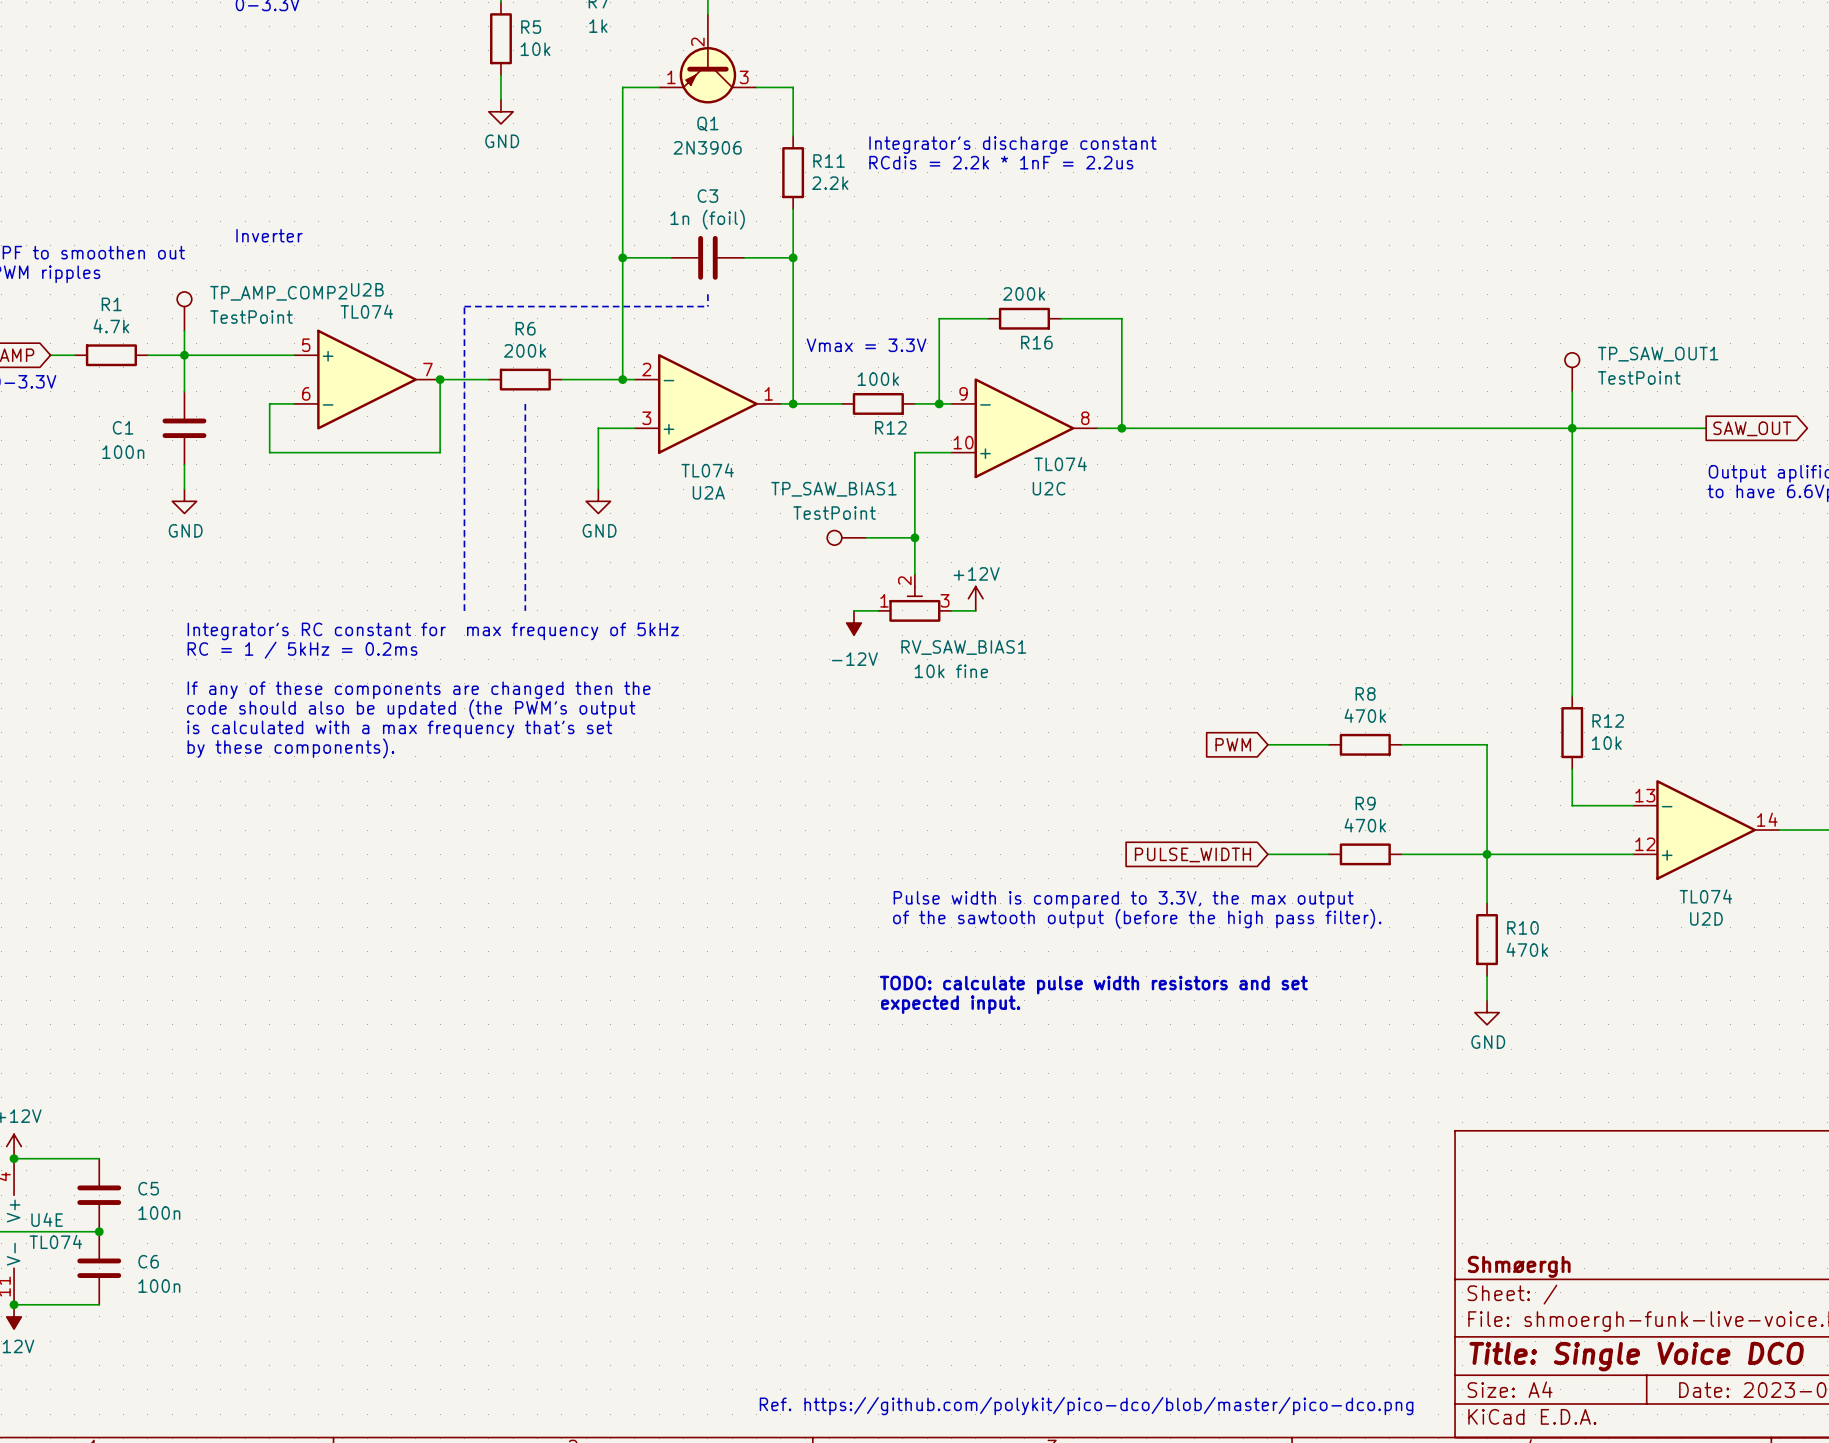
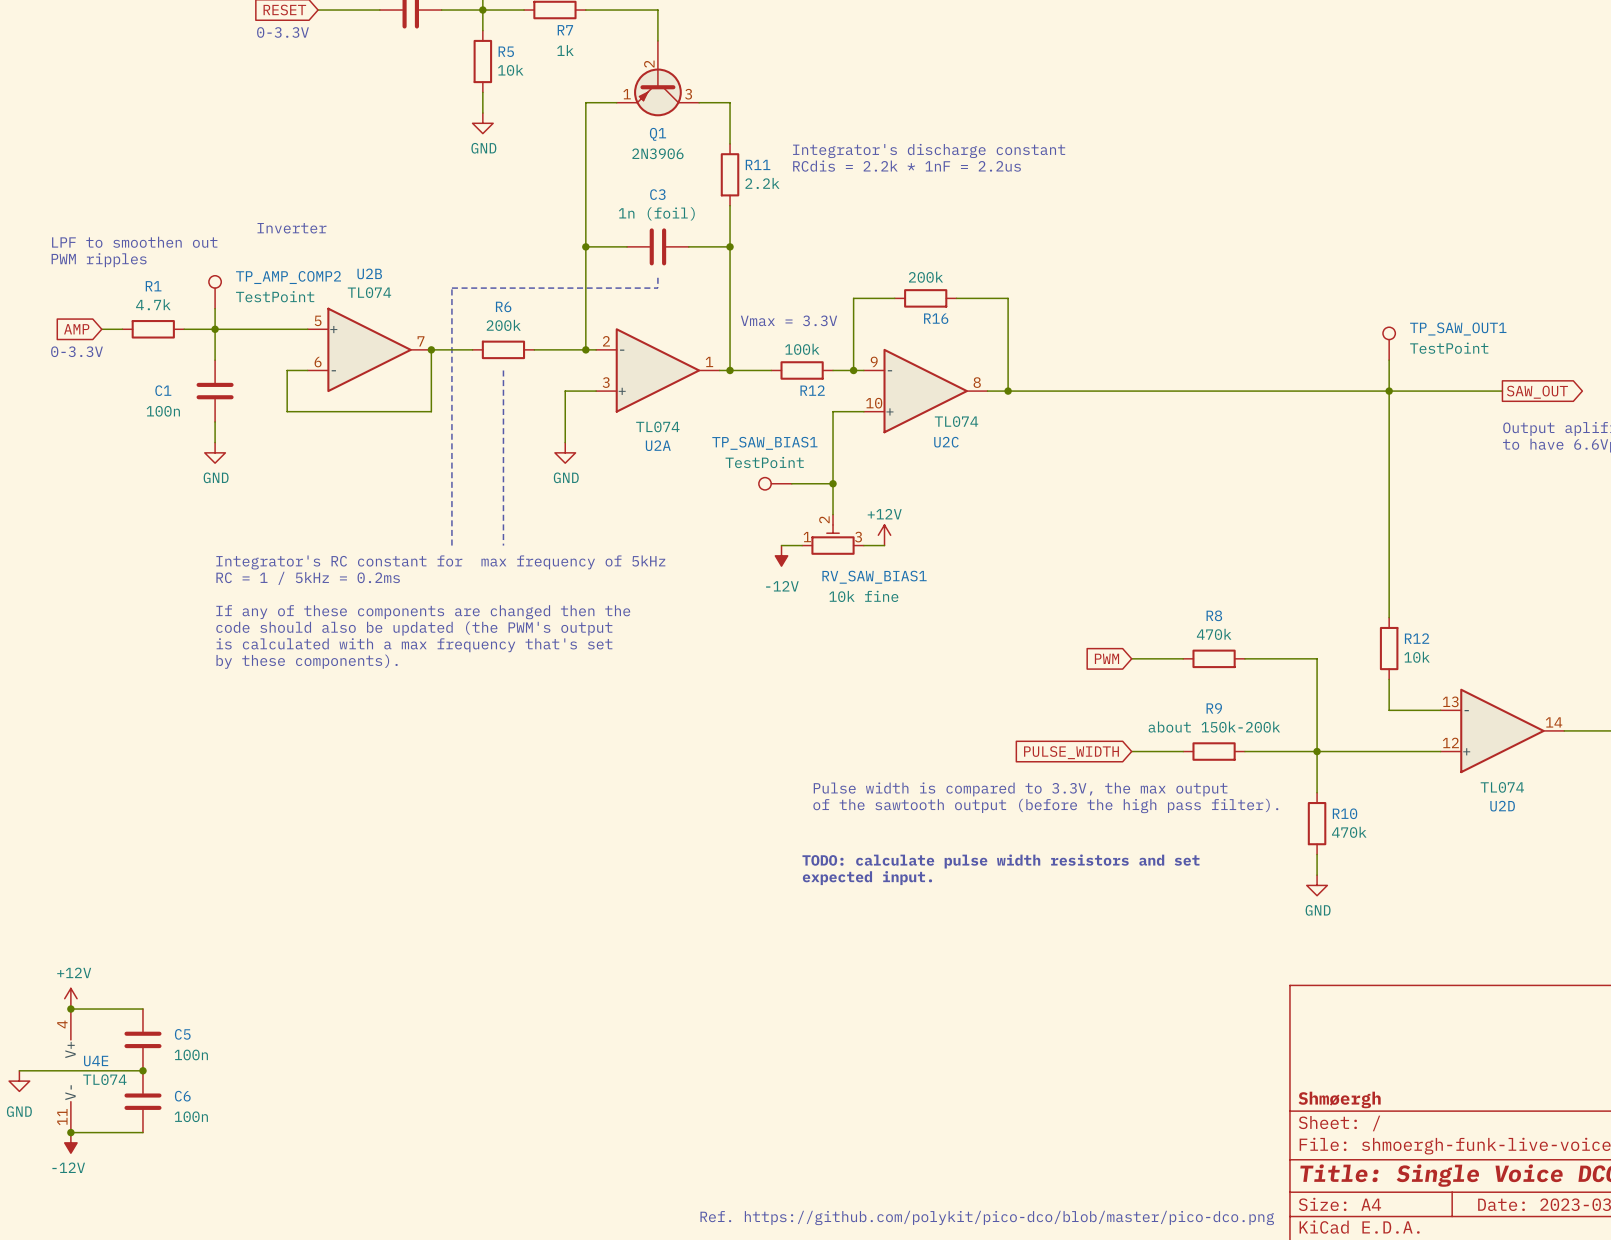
R9 value: 470k (1365, 825) -> about 150k-200k (1214, 727)

